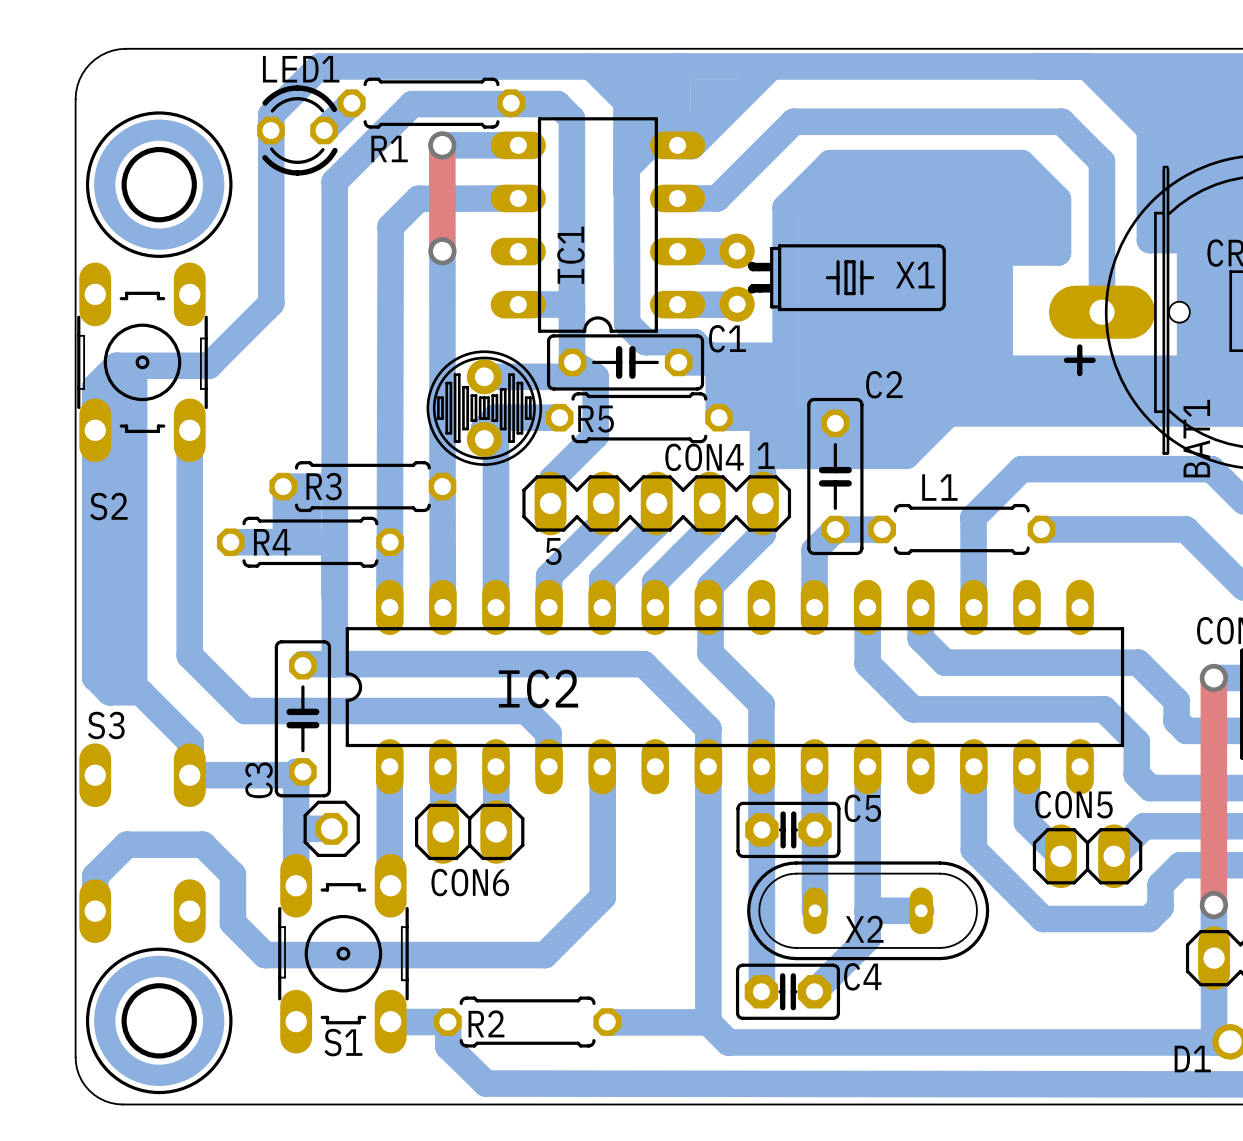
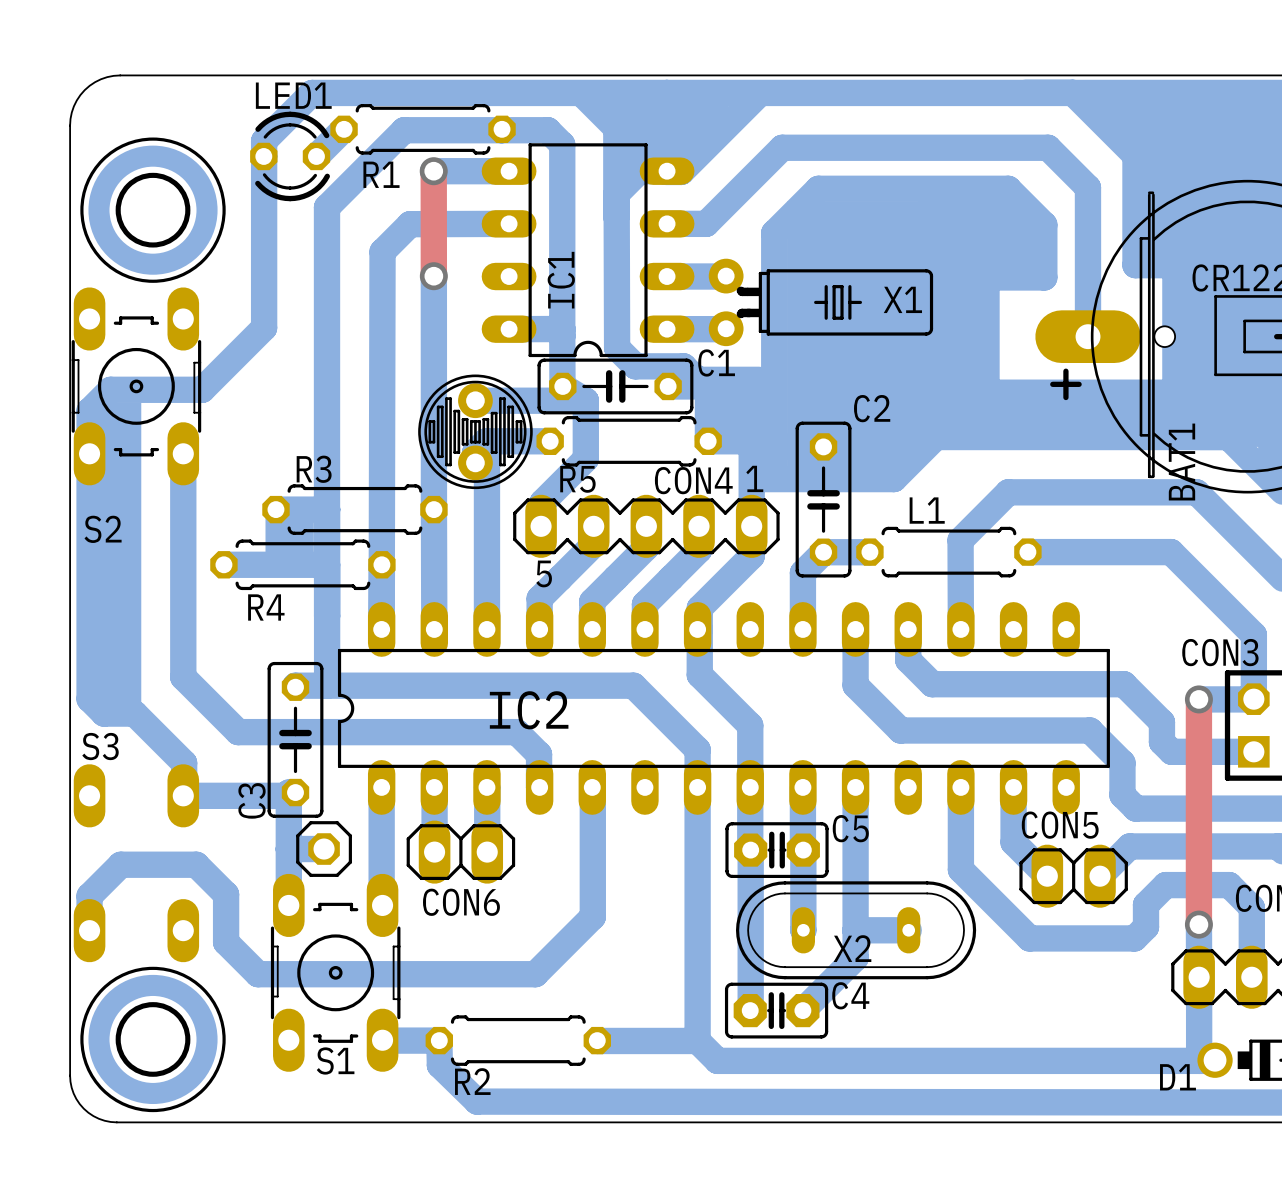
R5 name position: R5 (596, 419) -> R5 (577, 479)
R3 name position: R3 (324, 486) -> R3 (314, 469)
R4 name position: R4 (272, 542) -> R4 (266, 607)
R2 name position: R2 (486, 1023) -> R2 (472, 1081)

